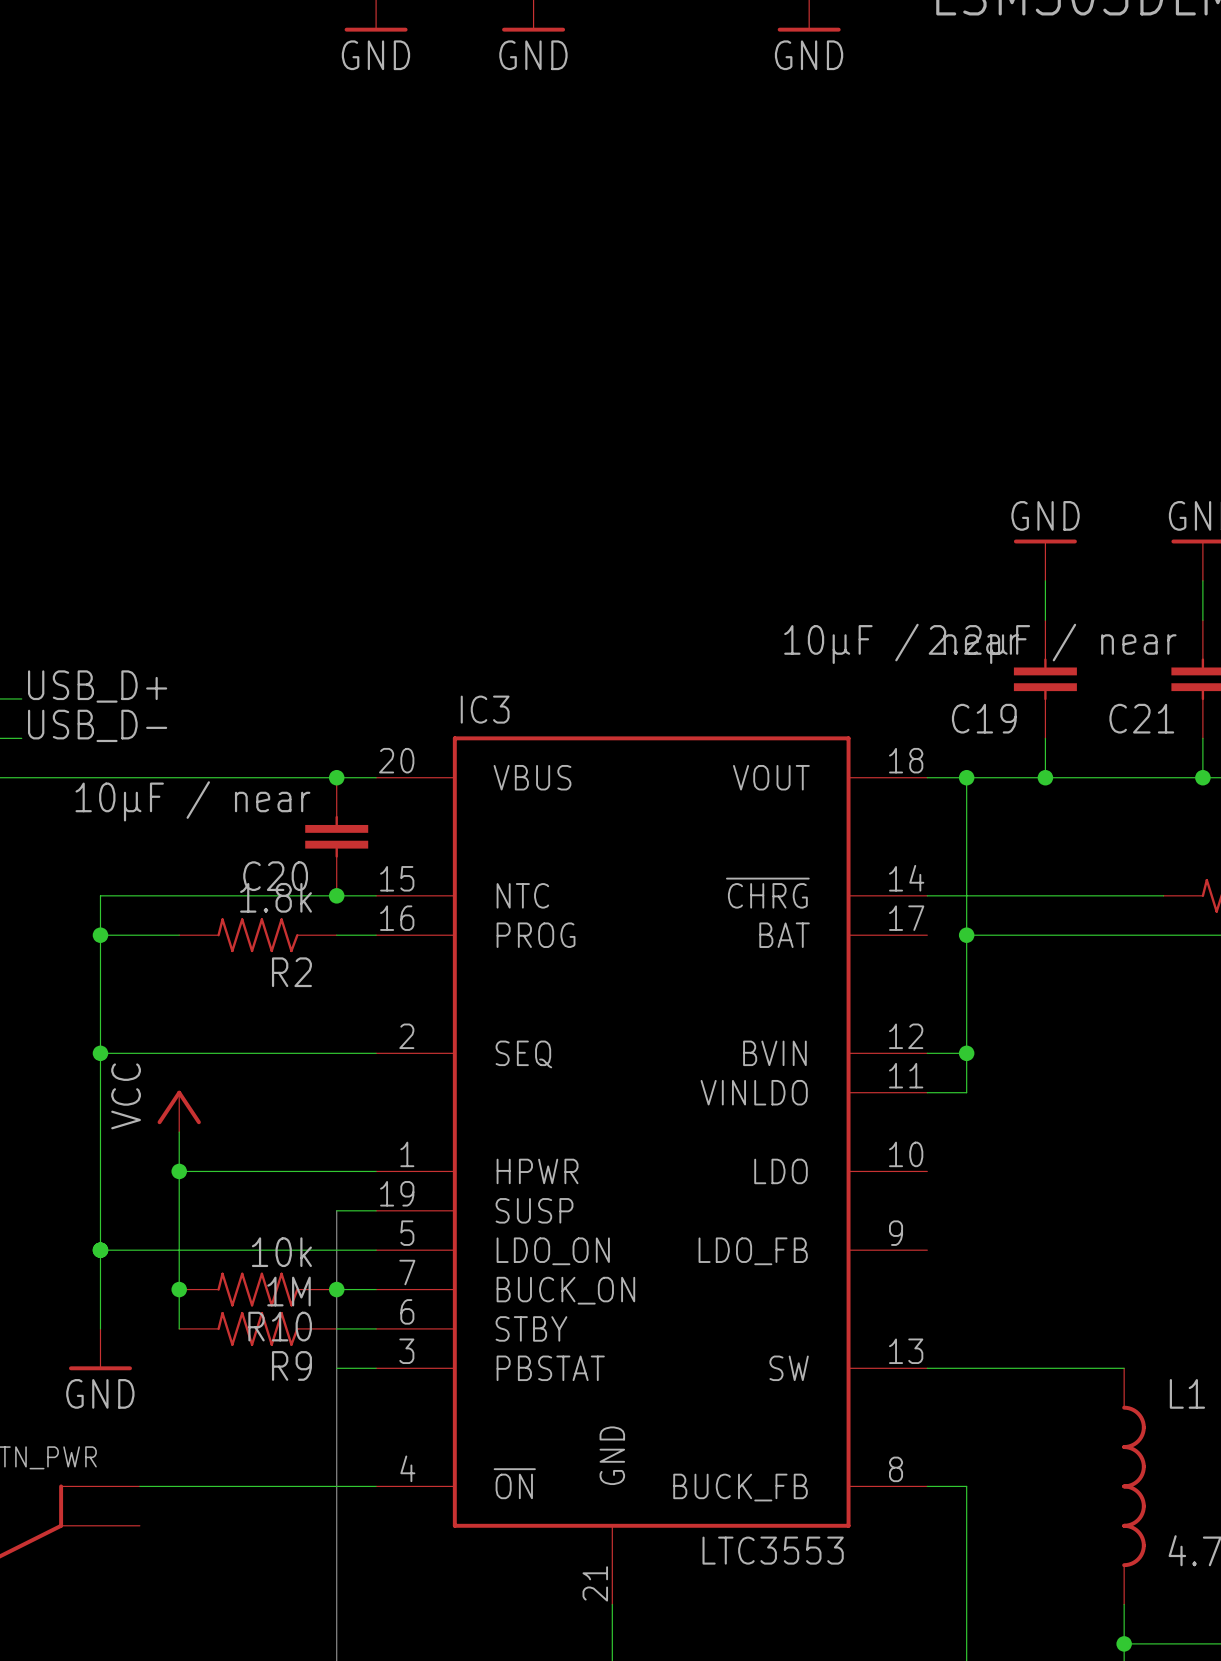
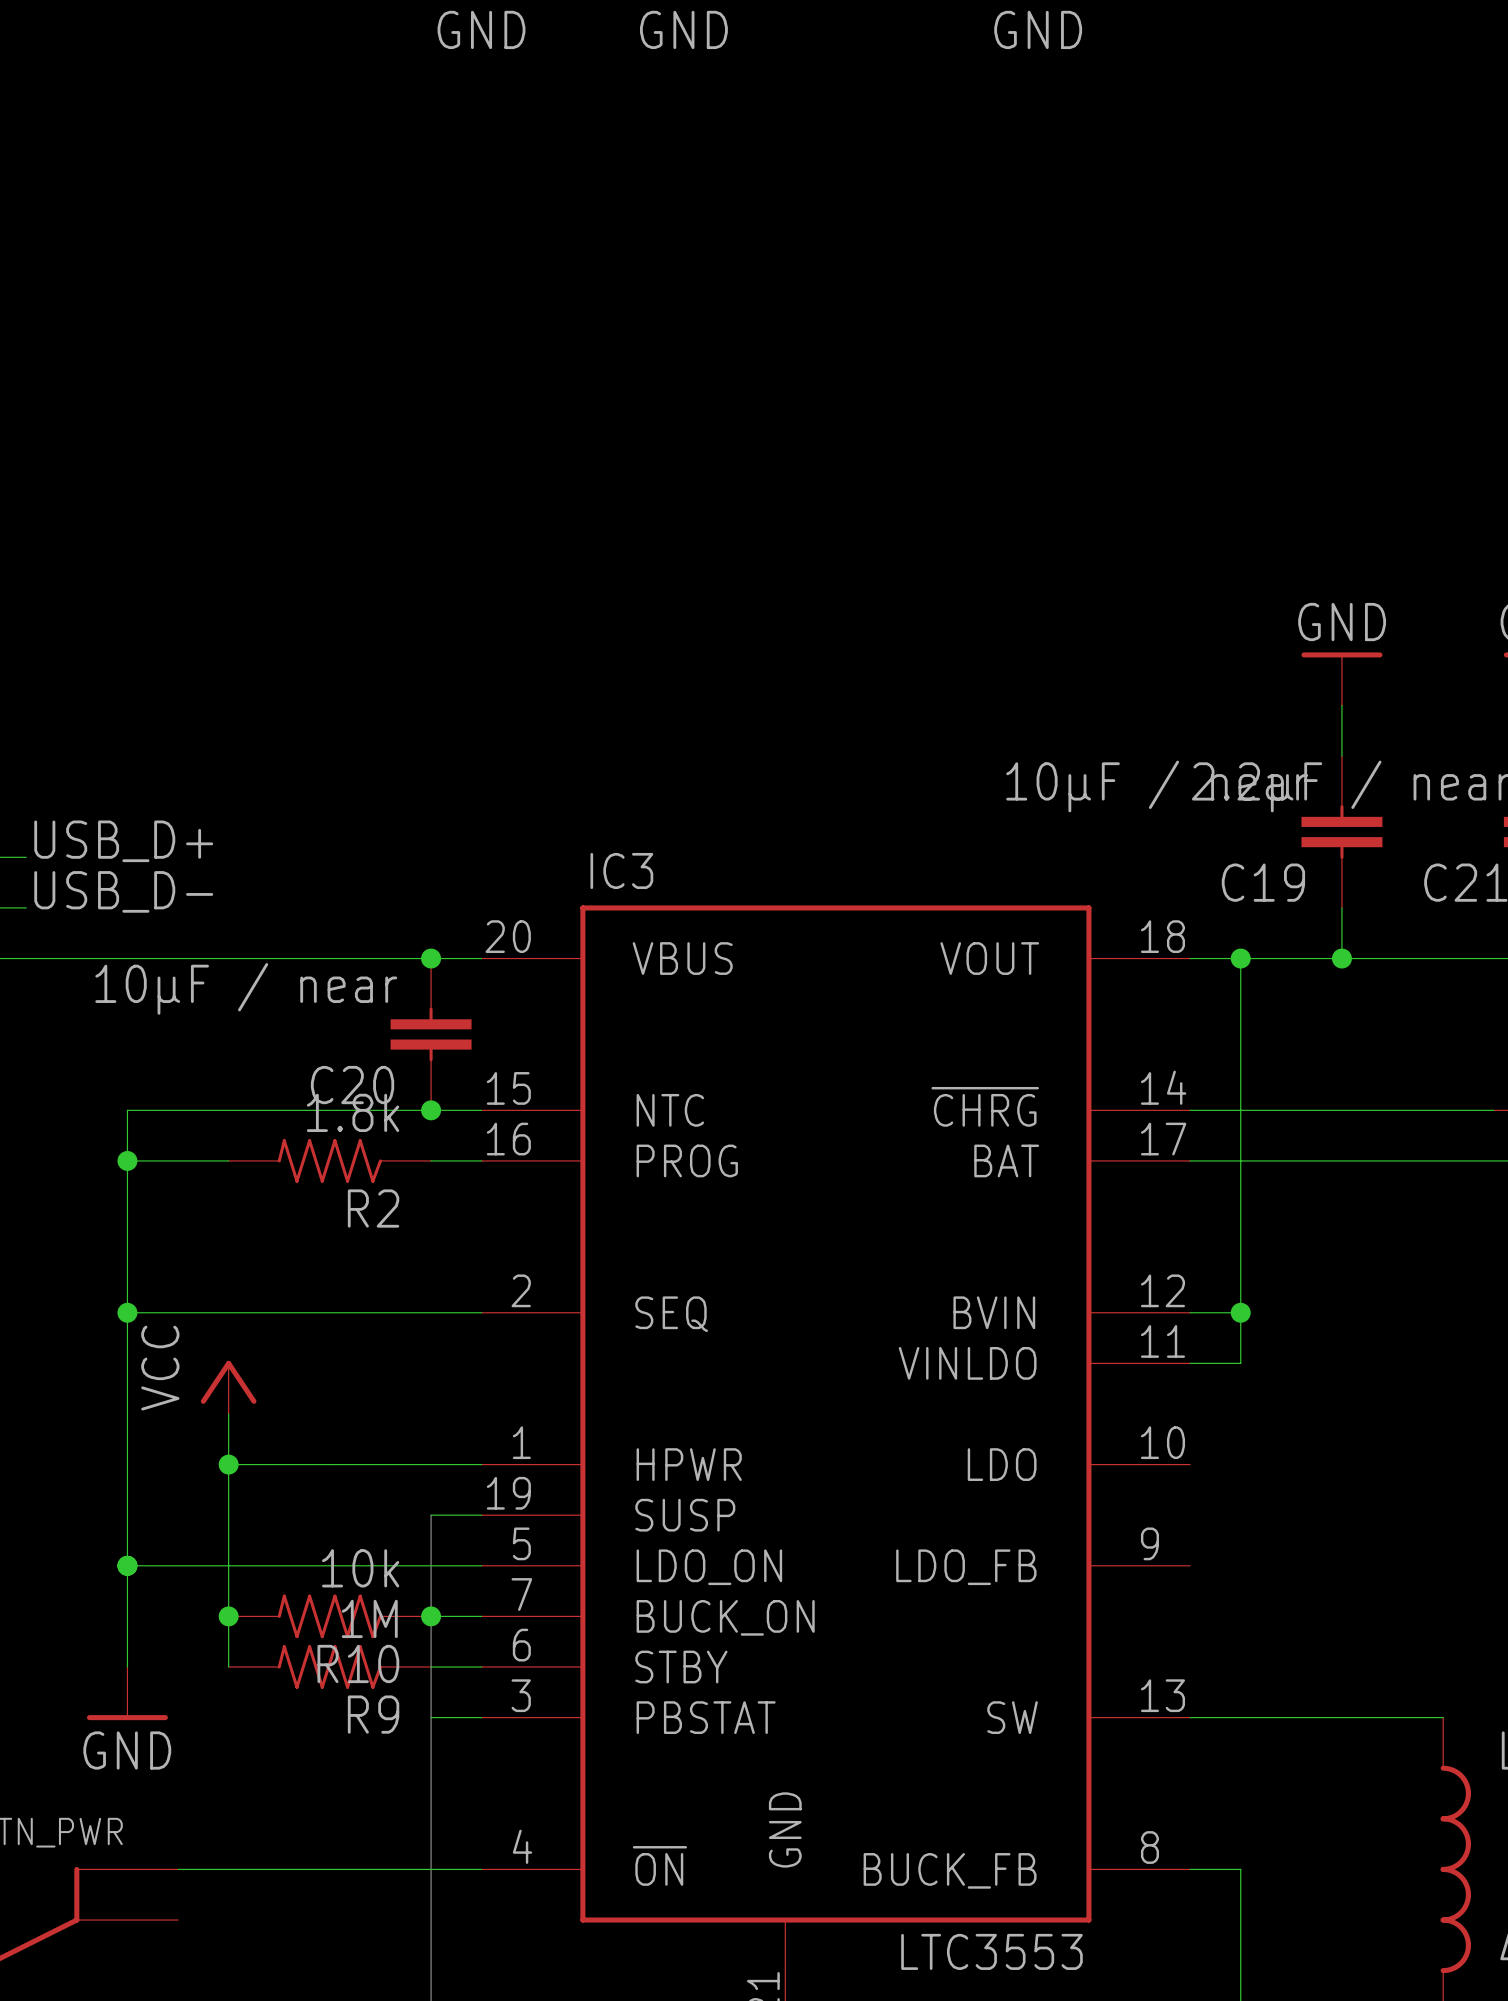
wire: none -> (1190, 1160) (1240, 1160)
junction: (966, 935) -> none

